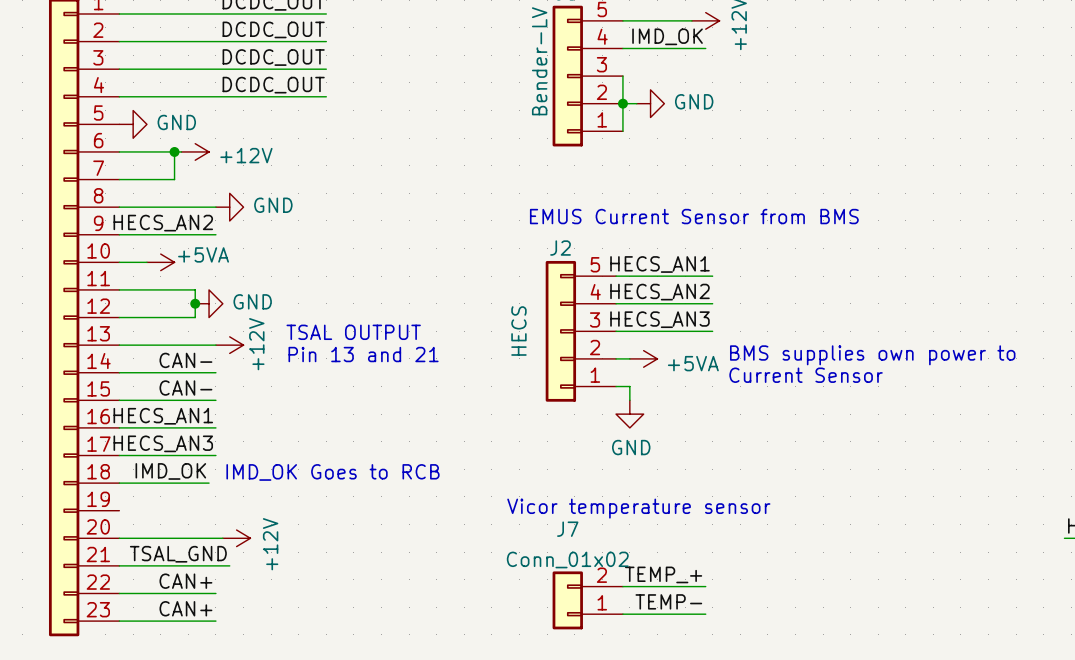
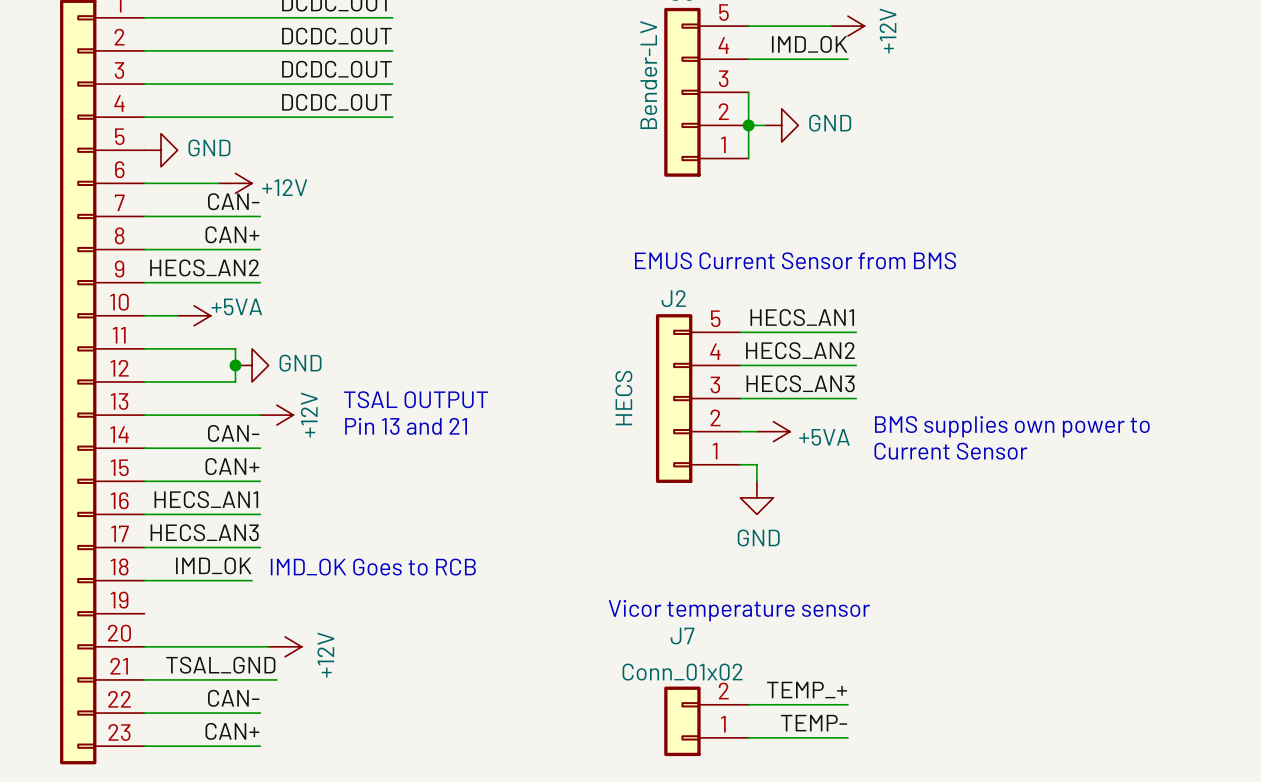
wire: (174, 151) (174, 179) -> (260, 216) (210, 216)
junction: (174, 151) -> none
label: none -> CAN- (233, 201)
label: none -> CAN+ (232, 234)
power symbol: GND (229, 207) -> none
label: CAN- (185, 388) -> CAN+ (232, 466)
label: CAN+ (185, 581) -> CAN- (233, 698)

